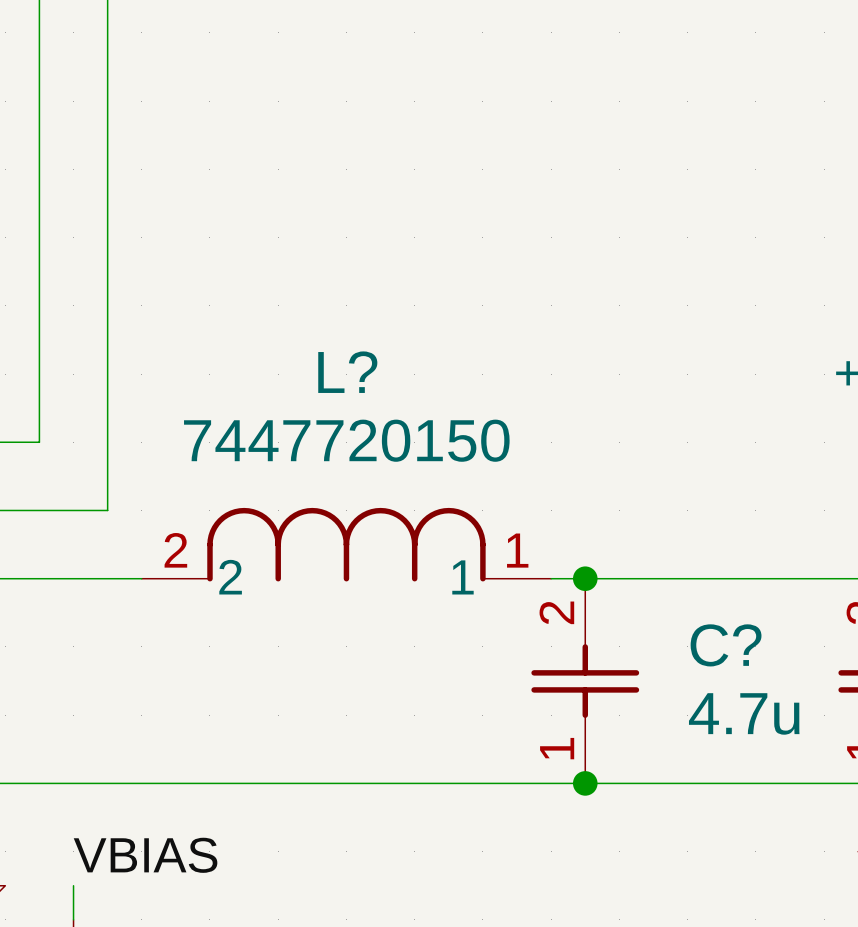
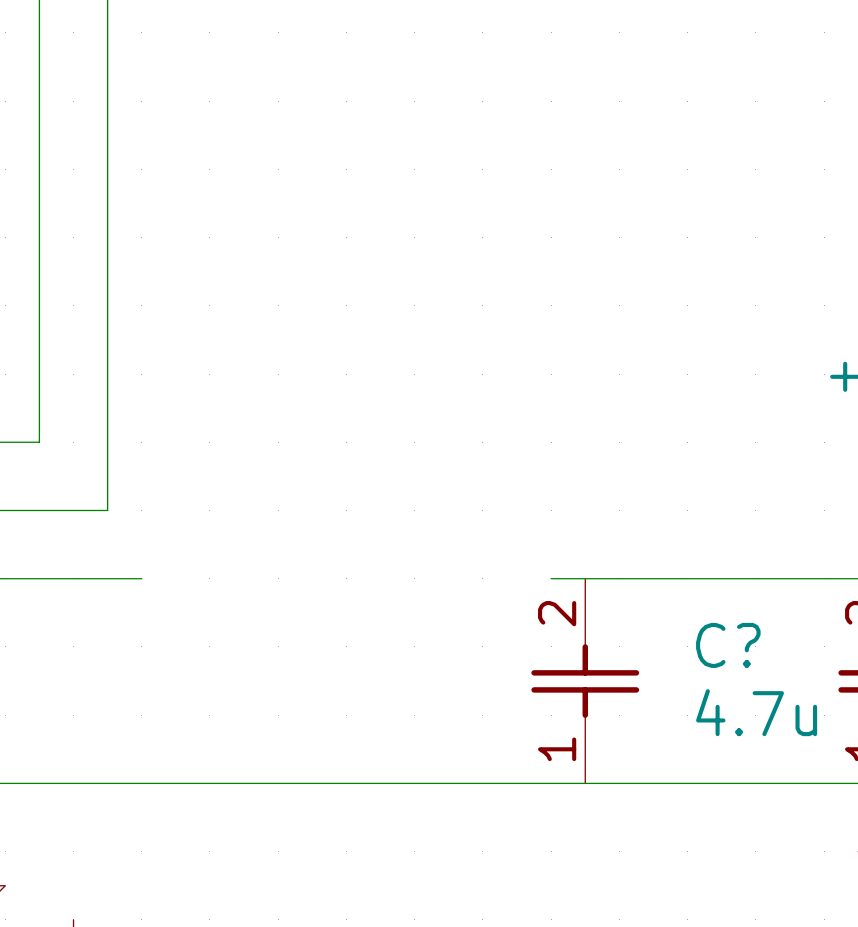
L?: 7447720150 (346, 544) -> none
junction: (585, 578) -> none
junction: (585, 783) -> none
label: VBIAS (145, 855) -> none
wire: (73, 885) (73, 919) -> none

